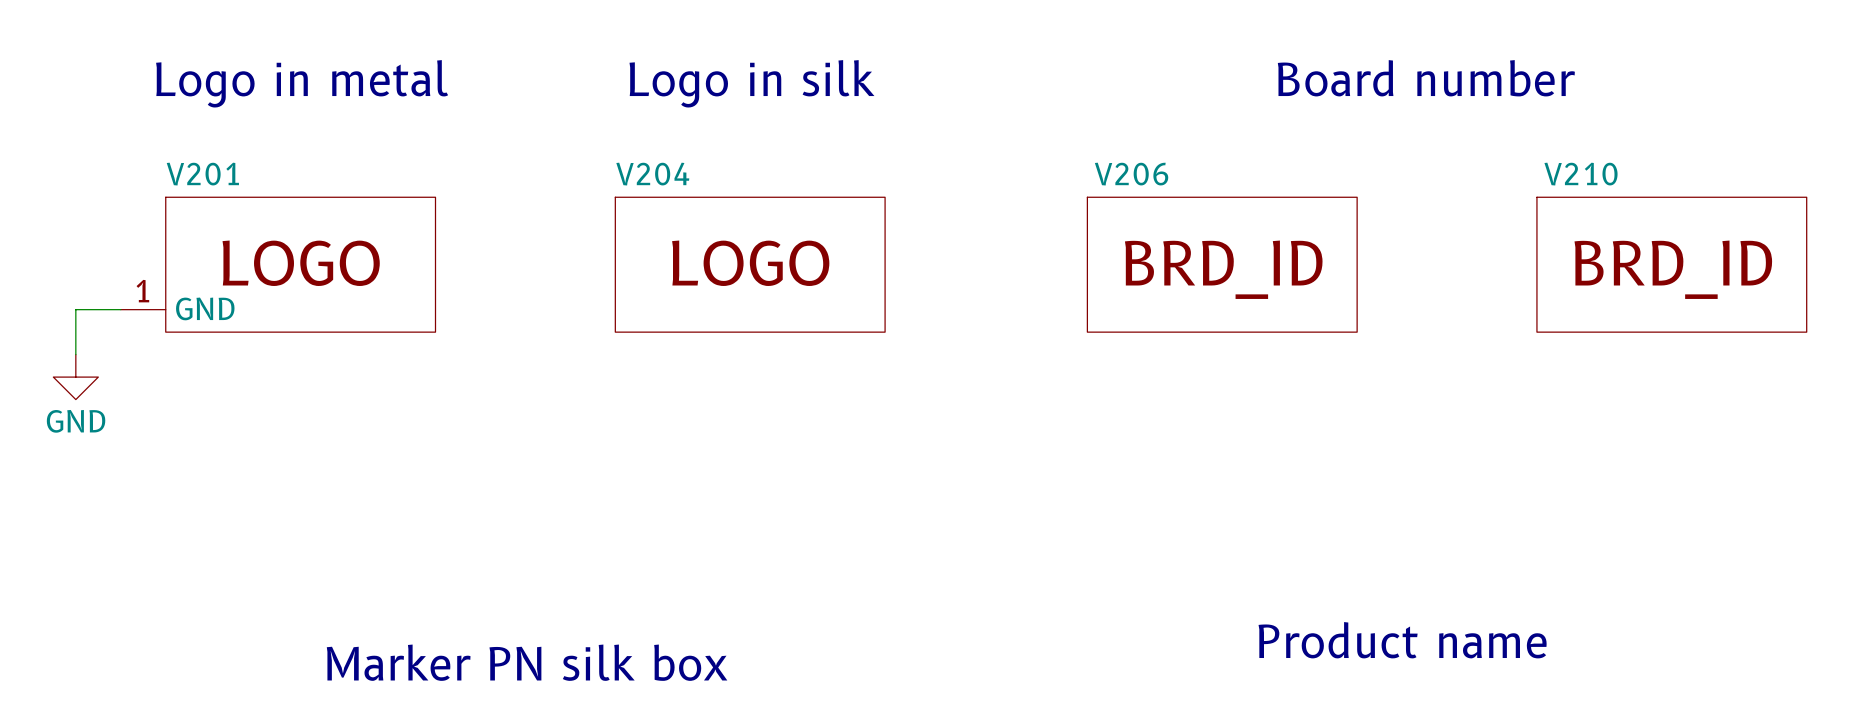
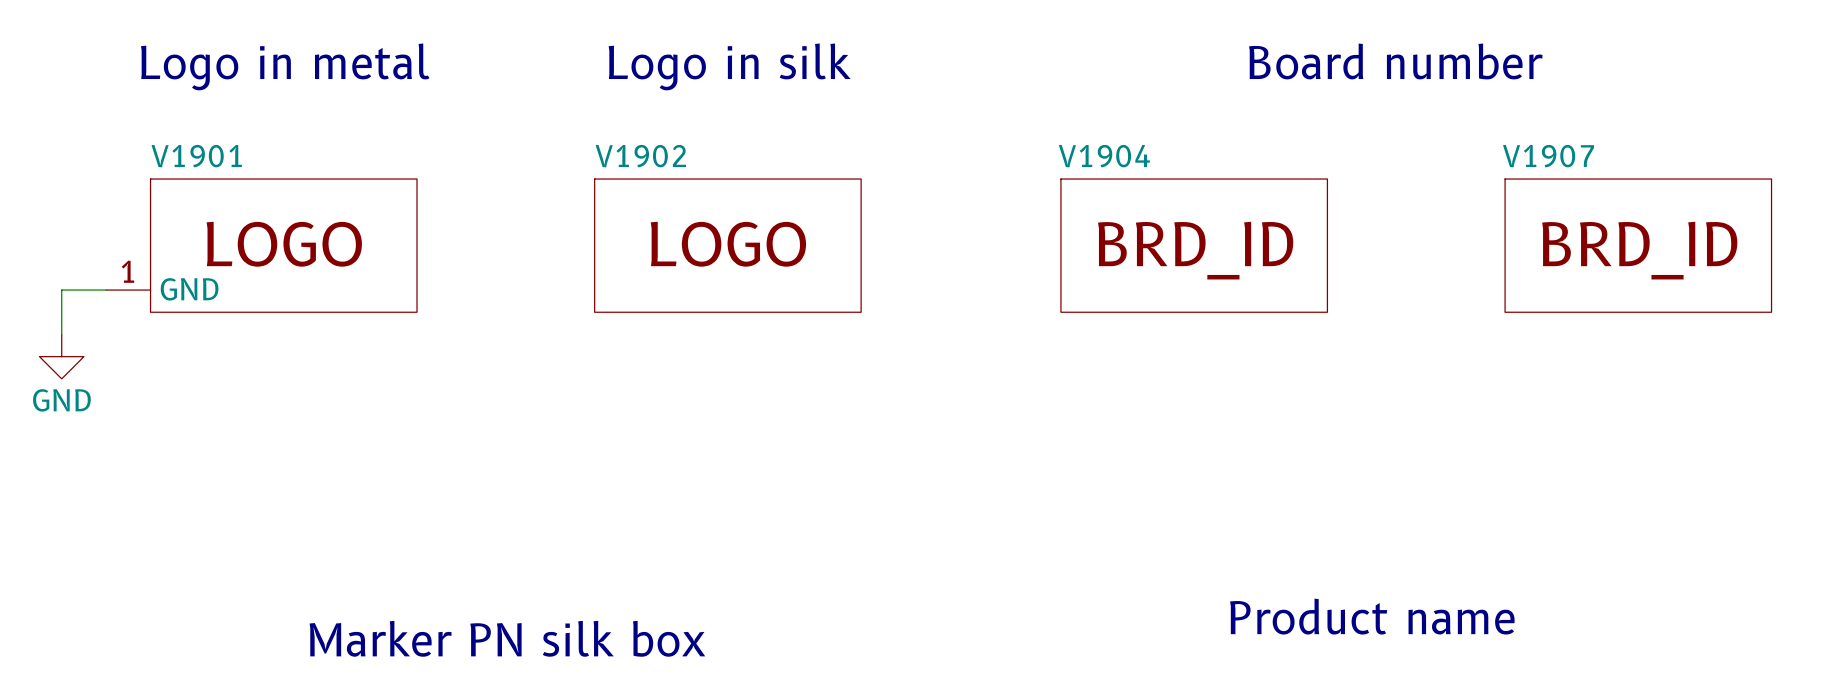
V201 name: V201 (202, 174) -> V1901 (196, 156)
V204 name: V204 (652, 174) -> V1902 (640, 156)
V206 name: V206 (1131, 174) -> V1904 (1104, 156)
V210 name: V210 (1581, 174) -> V1907 (1548, 156)

